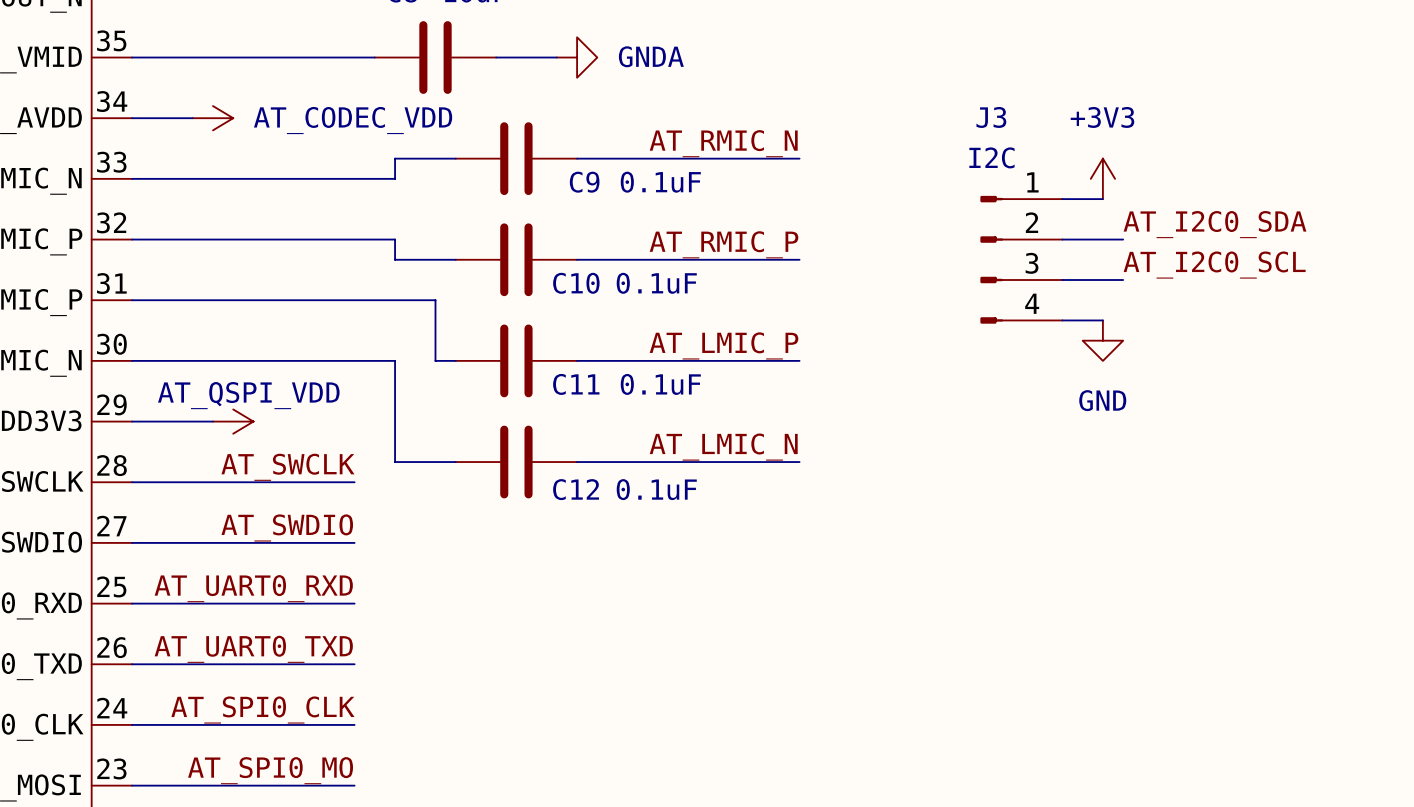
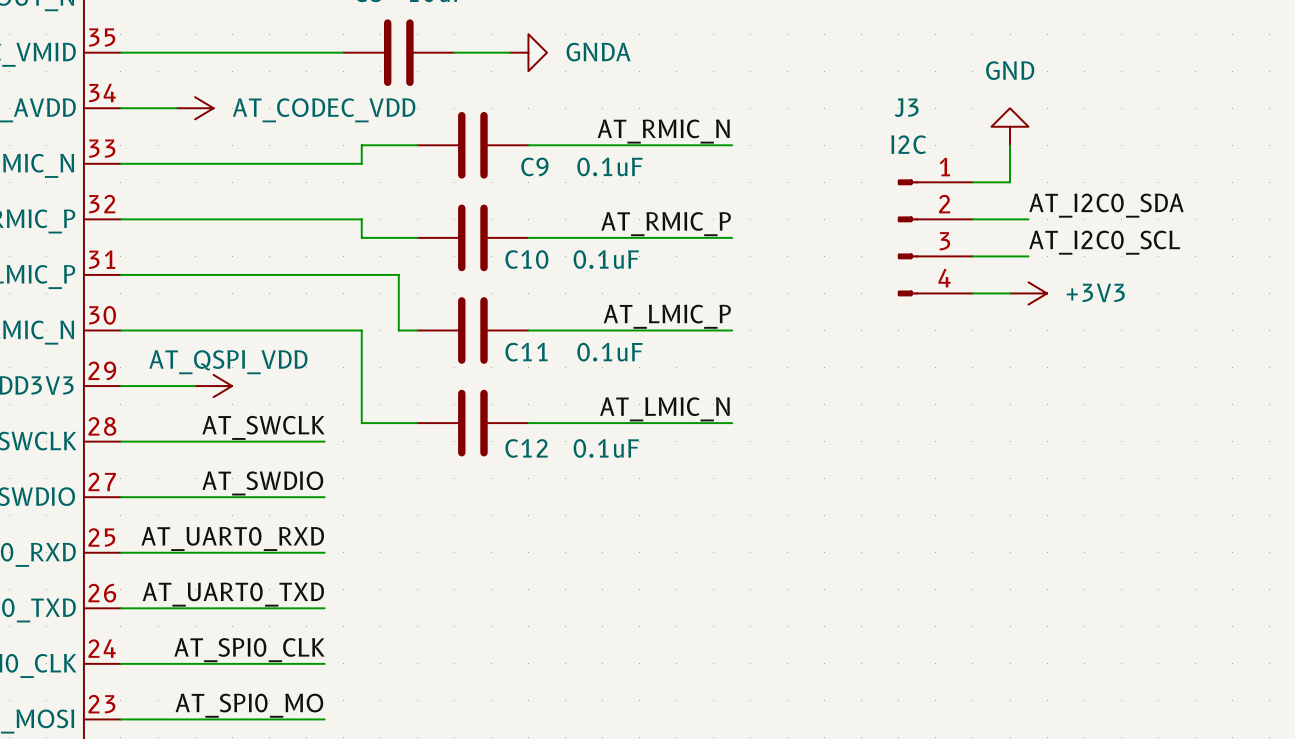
power symbol rotation: 0° (1102, 178) -> 90° clockwise (1028, 293)
power symbol position: +3V3 (1102, 178) -> +3V3 (1028, 293)
power symbol rotation: 0° (1102, 340) -> 180° (1010, 126)
power symbol position: GND (1102, 340) -> GND (1010, 126)

